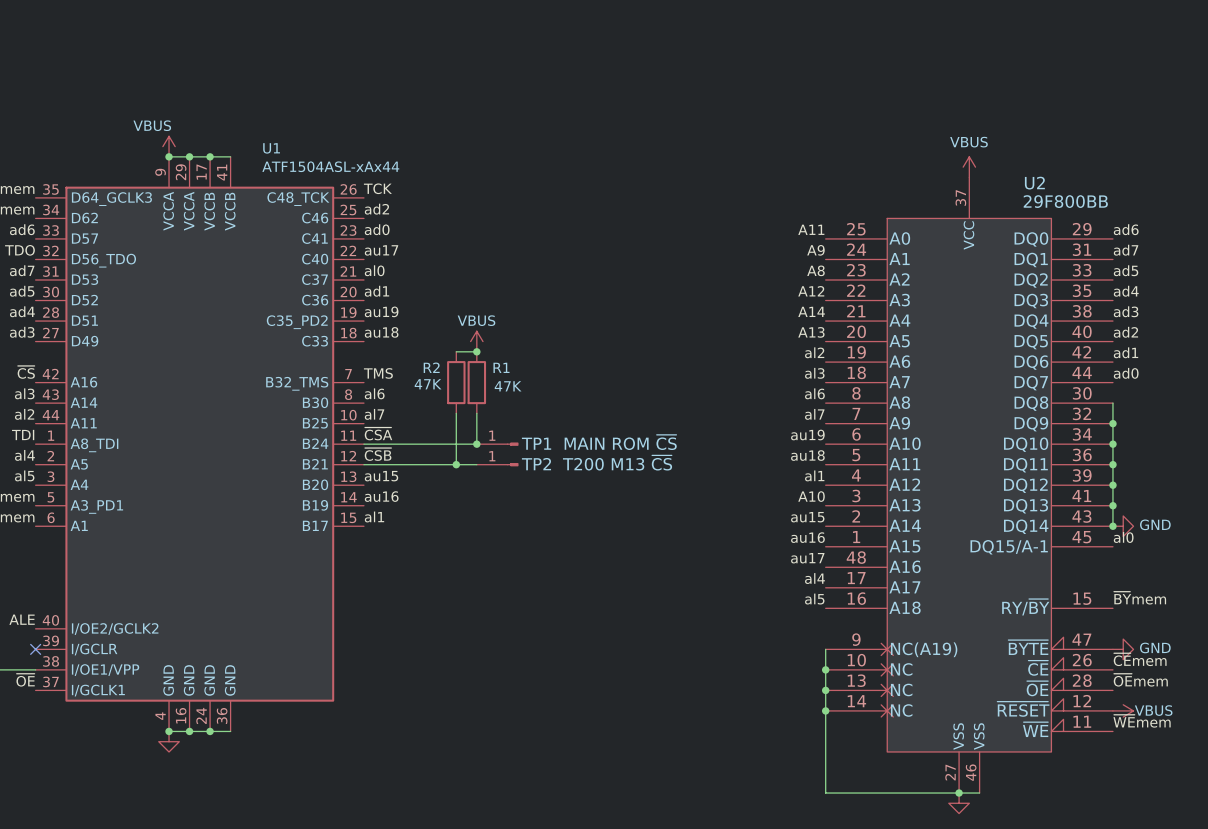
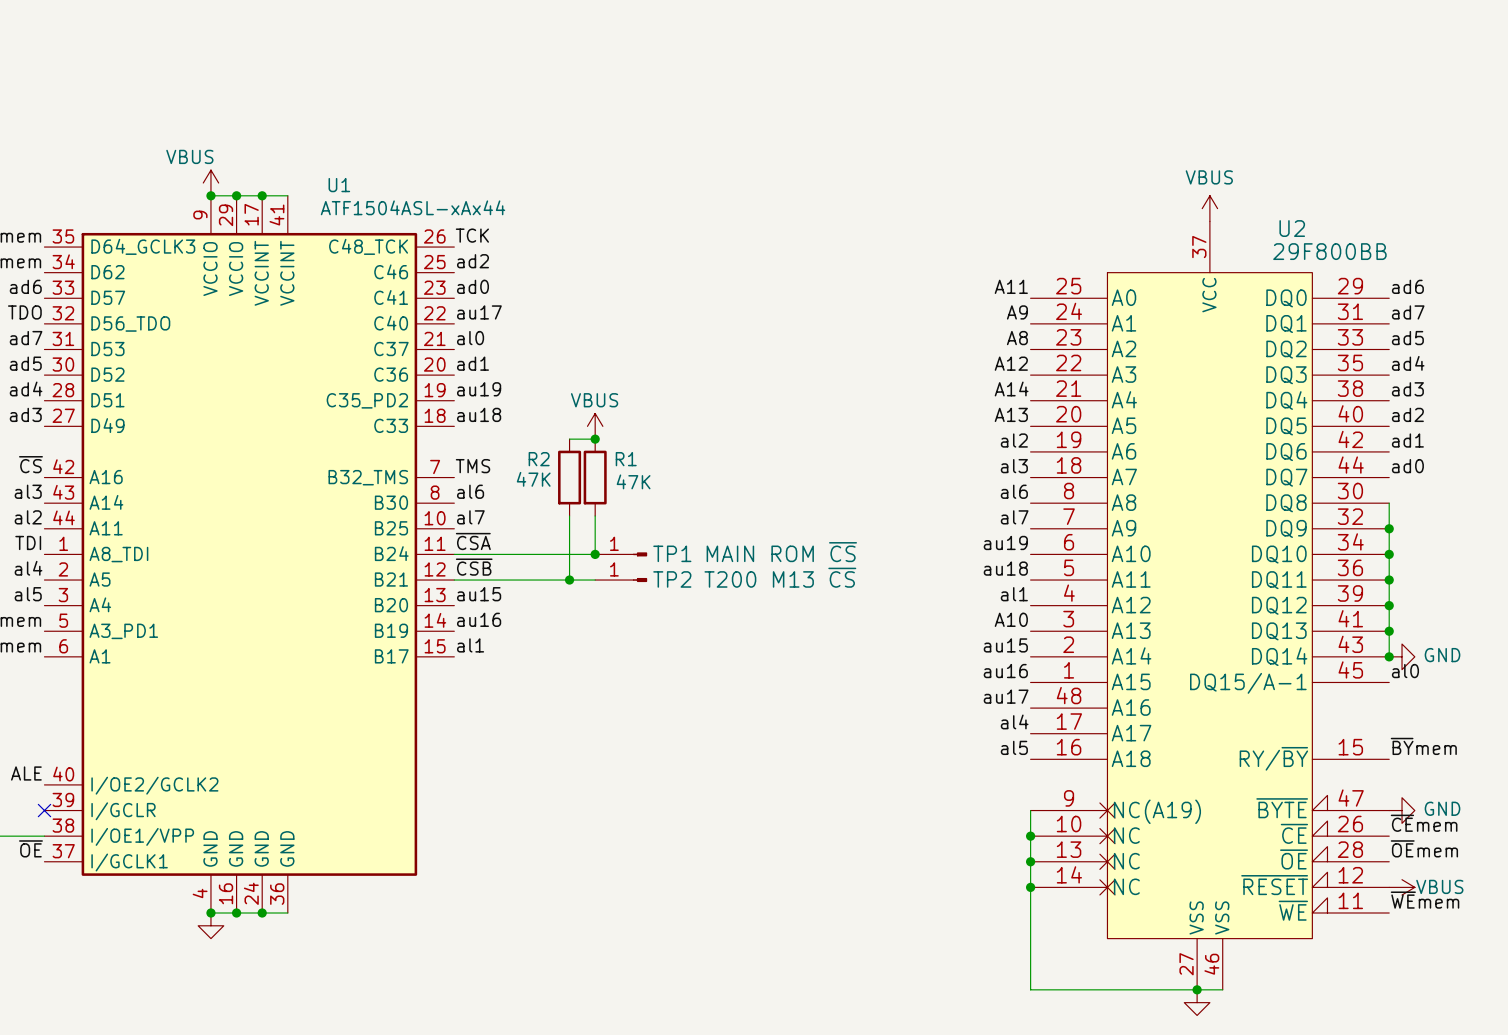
U1 pin name: VCCA (168, 211) -> VCCIO (210, 269)
U1 pin name: VCCA (189, 211) -> VCCIO (236, 269)
U1 pin name: VCCB (209, 211) -> VCCINT (261, 273)
U1 pin name: VCCB (230, 211) -> VCCINT (287, 273)

